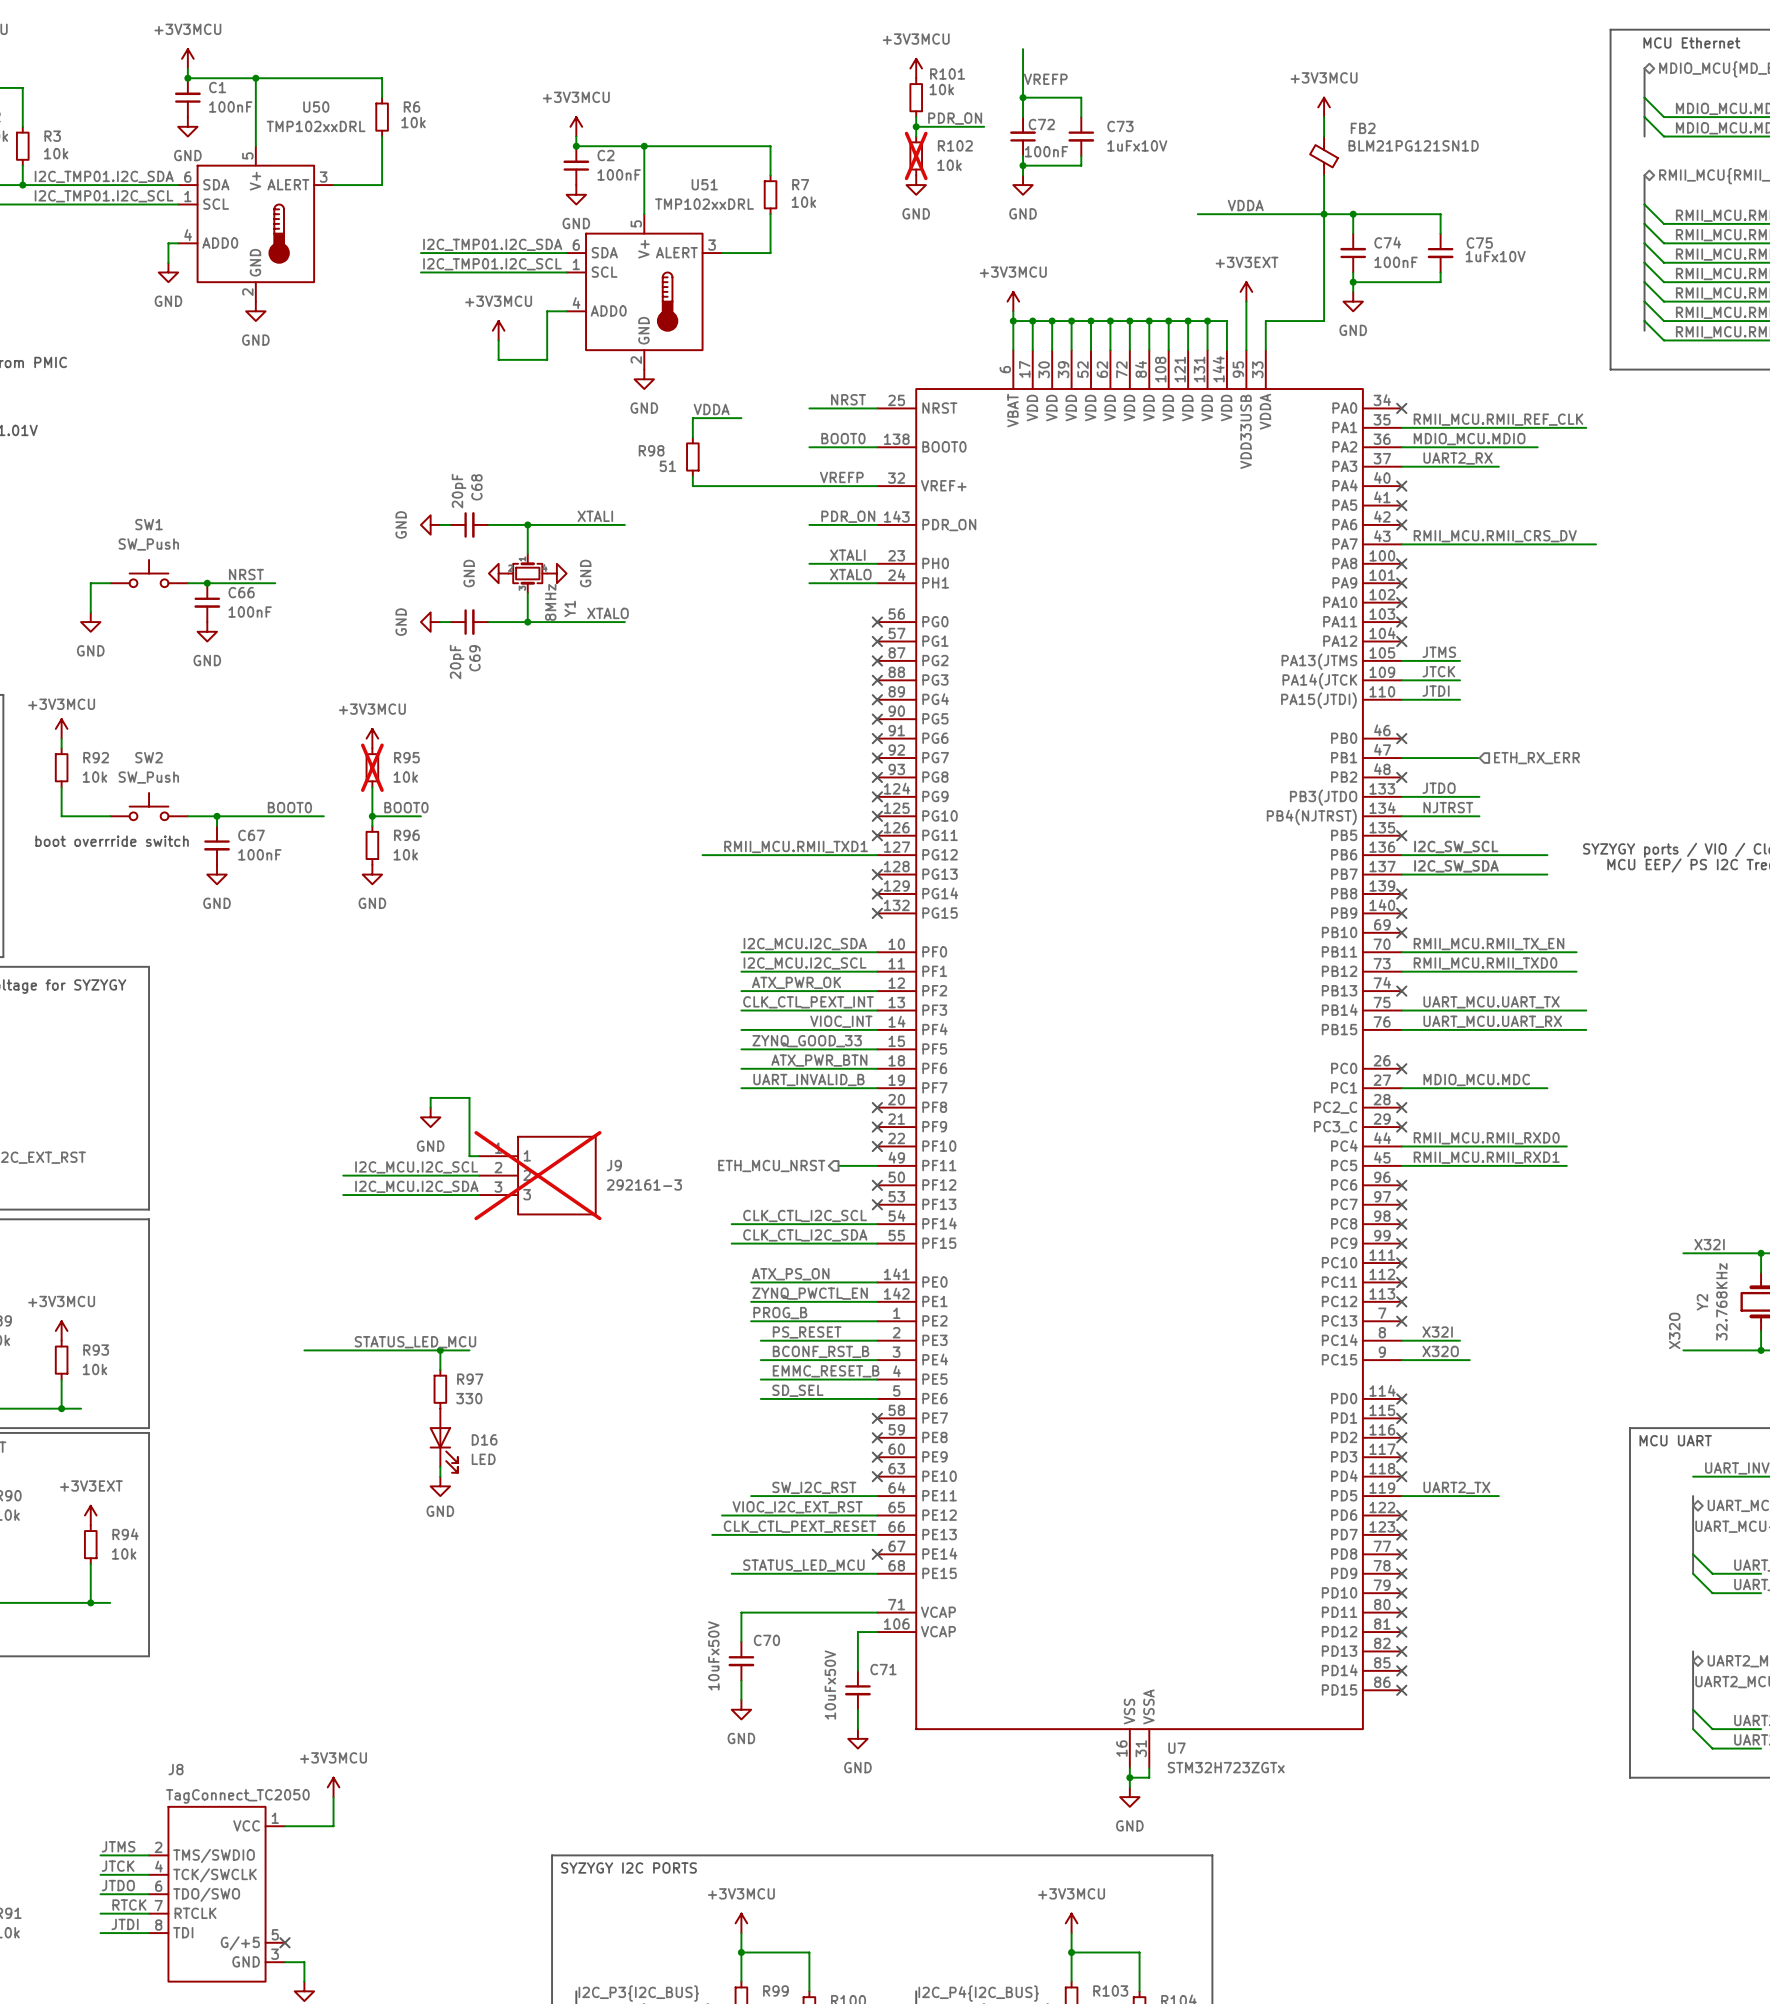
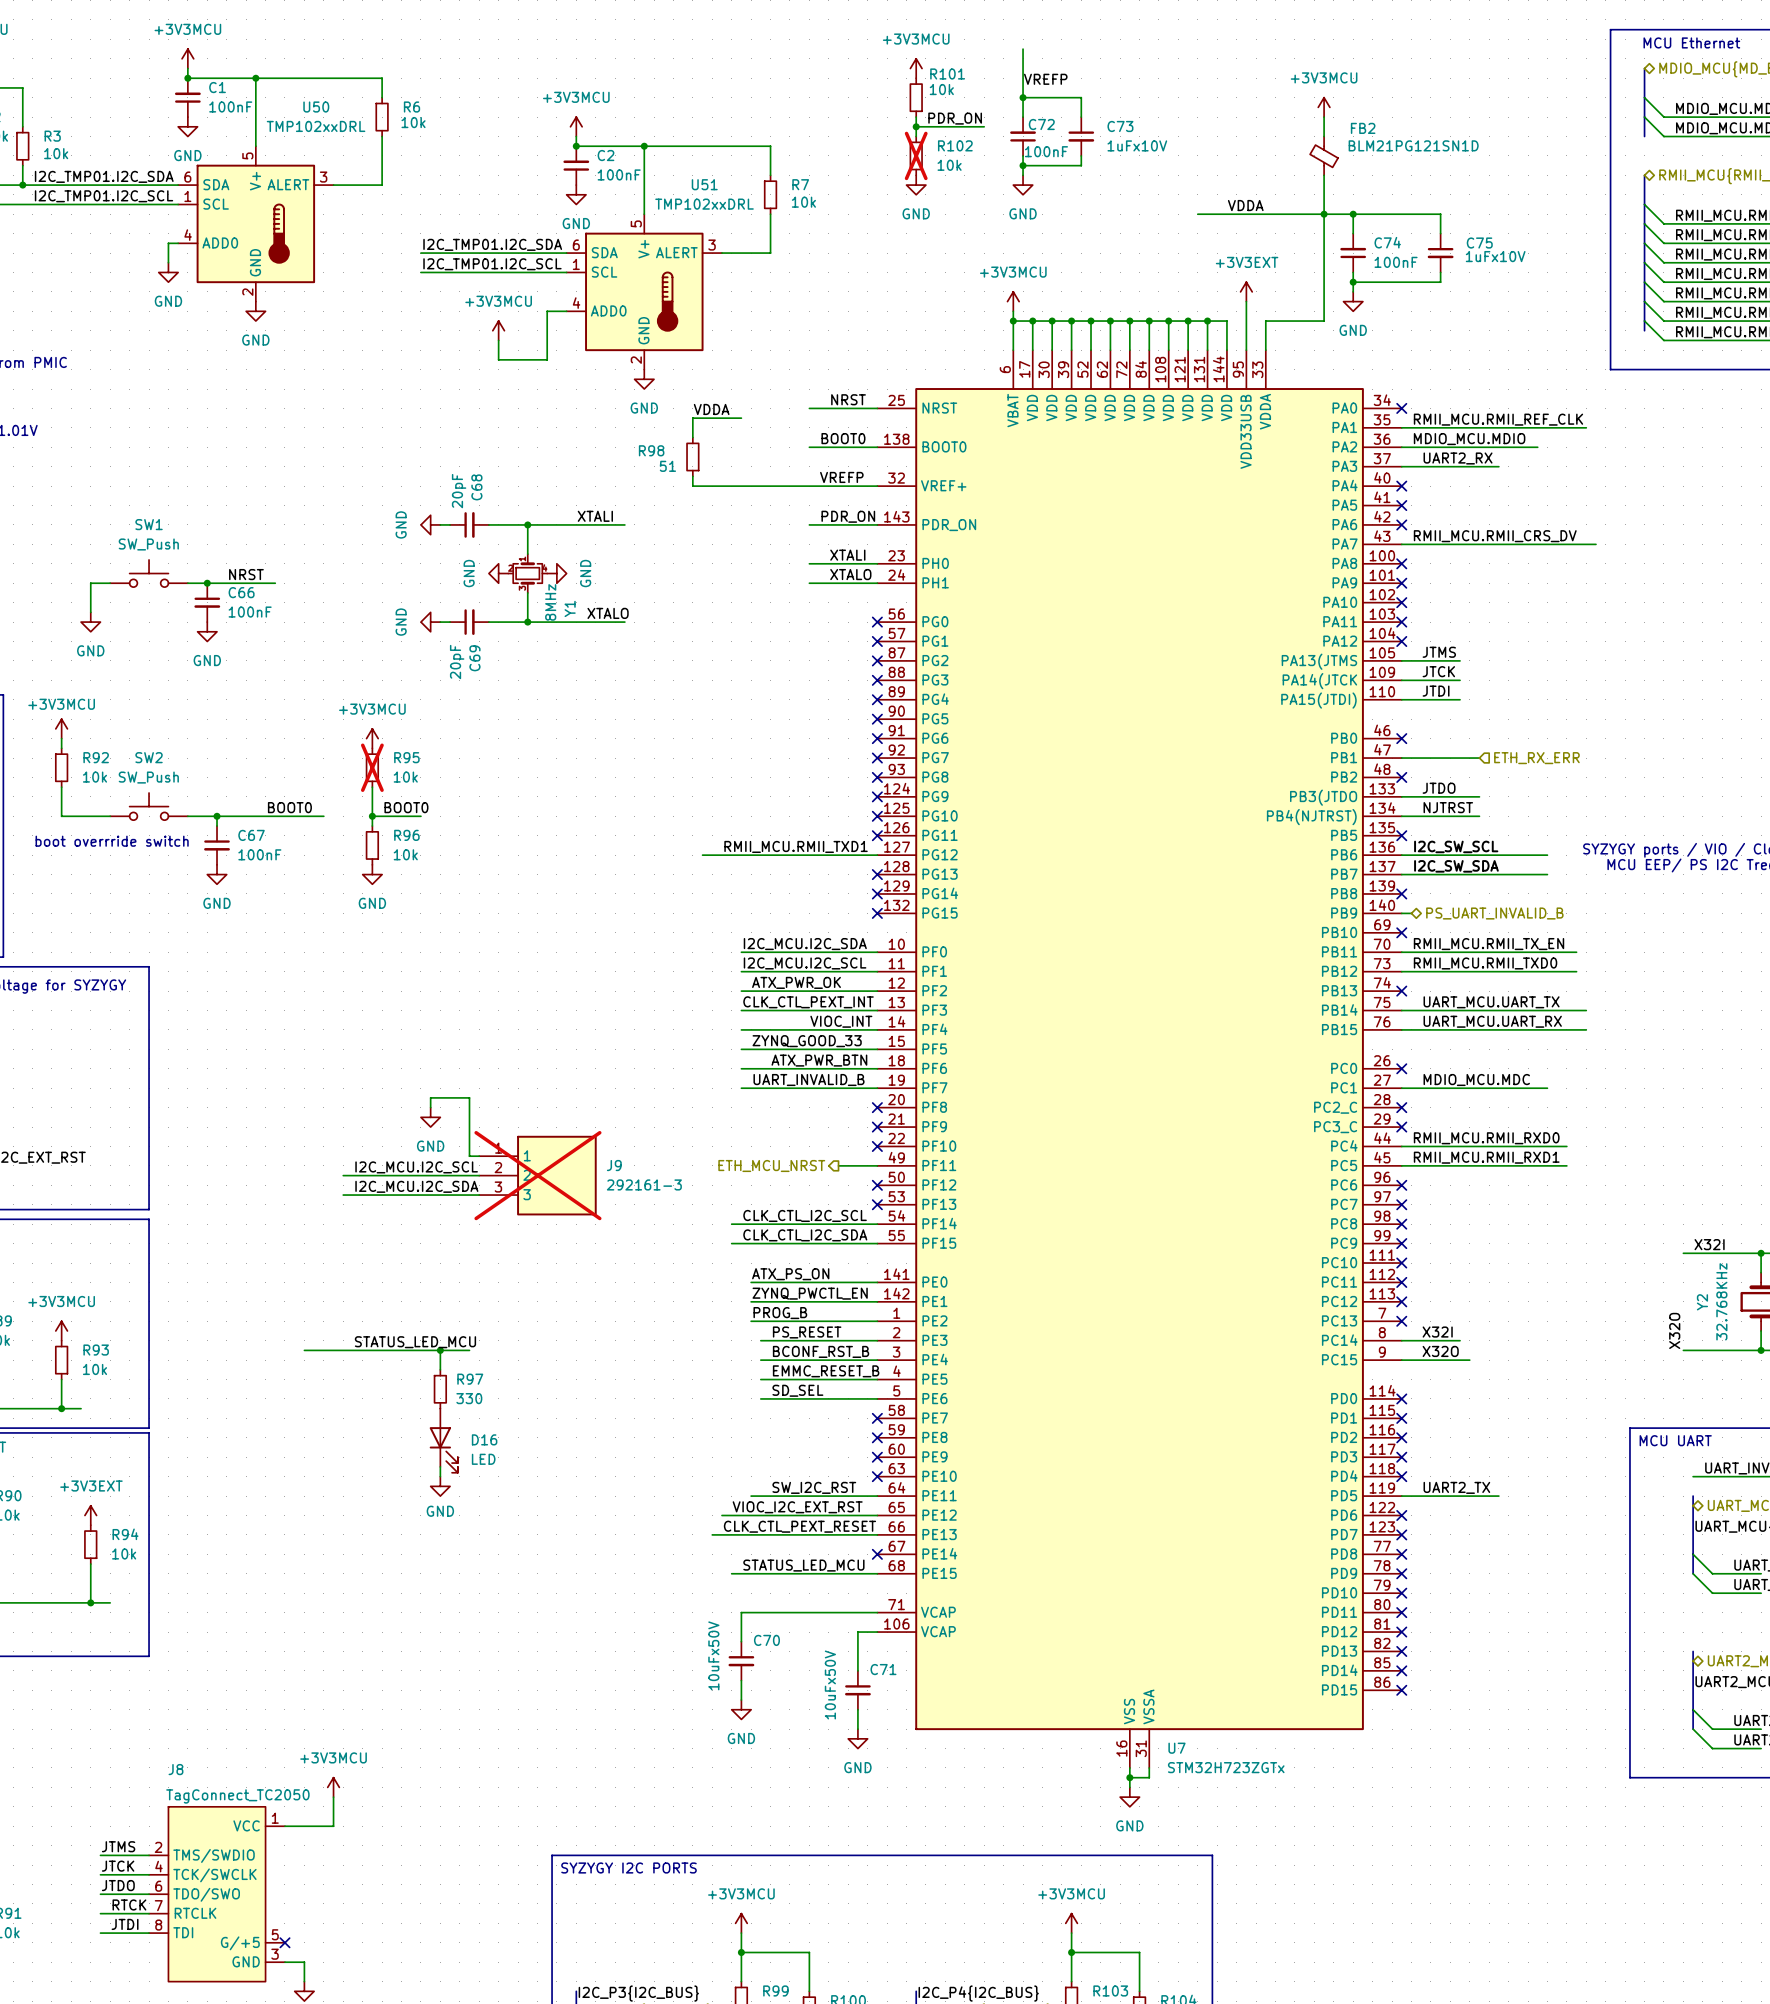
wire: none -> (1401, 913) (1411, 913)
no-connect mark: (1401, 913) -> none
hierarchical label: none -> PS_UART_INVALID_B (1494, 913)

